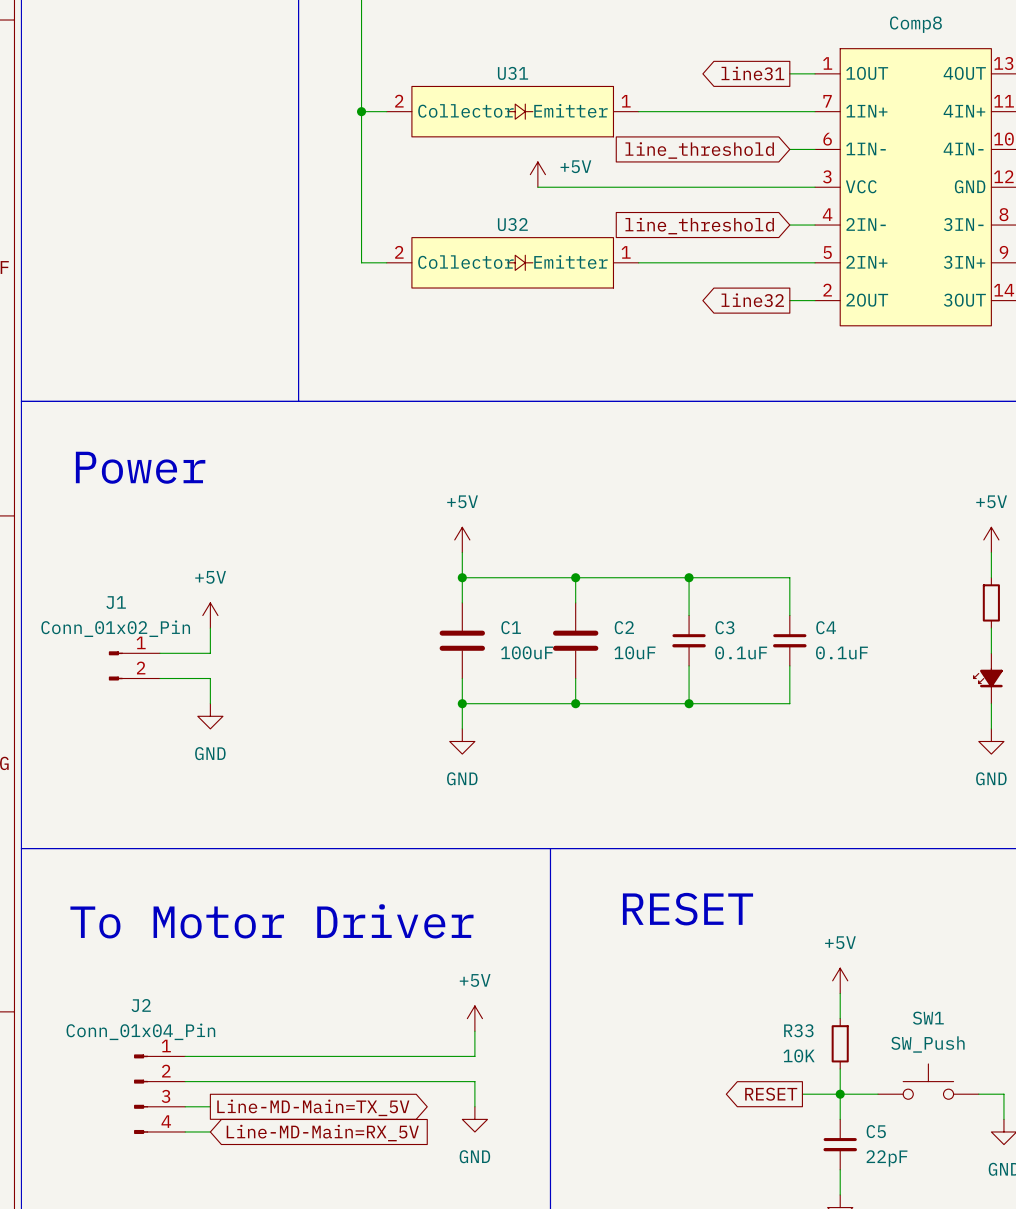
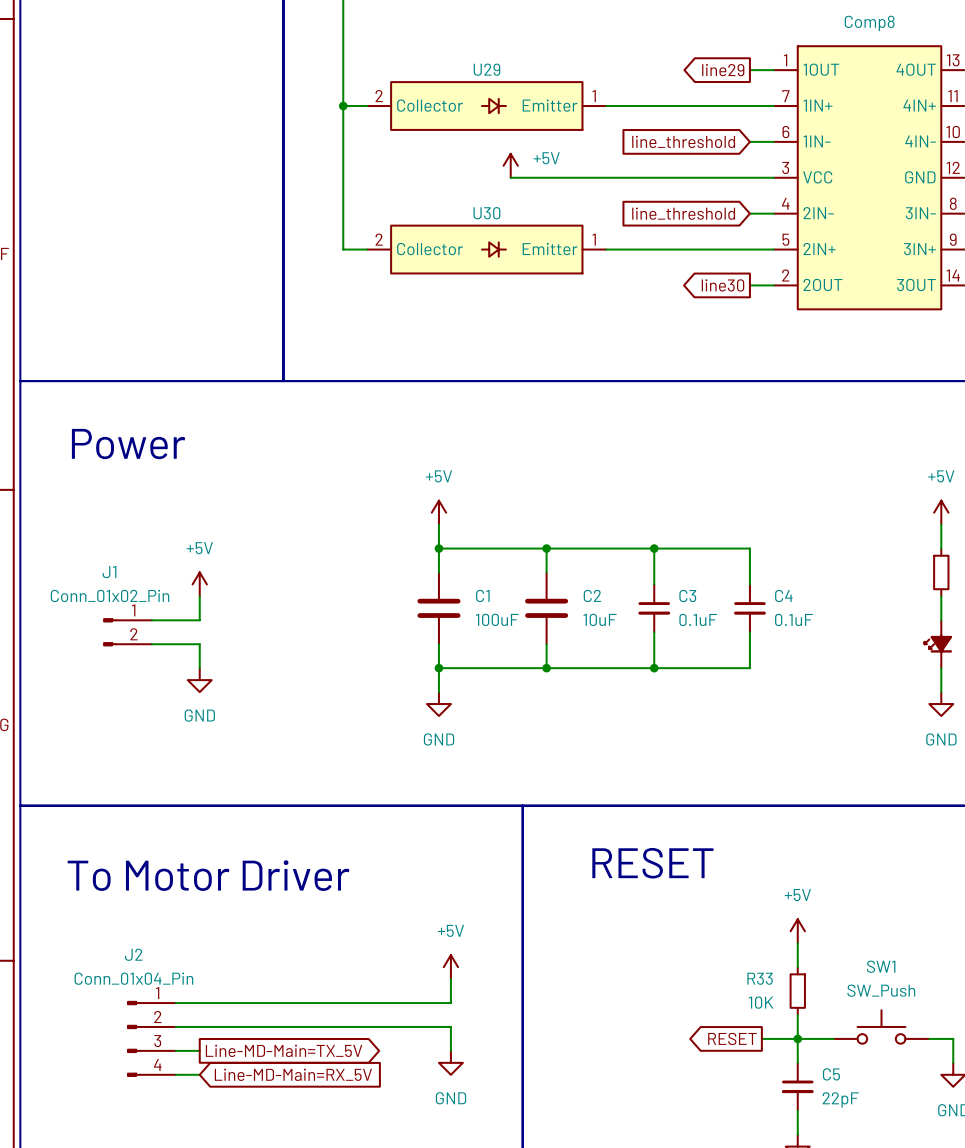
U31 name: U31 (512, 73) -> U29 (486, 69)
global label: line31 (752, 73) -> line29 (723, 70)
U32 name: U32 (512, 224) -> U30 (486, 213)
global label: line32 (752, 300) -> line30 (722, 285)

